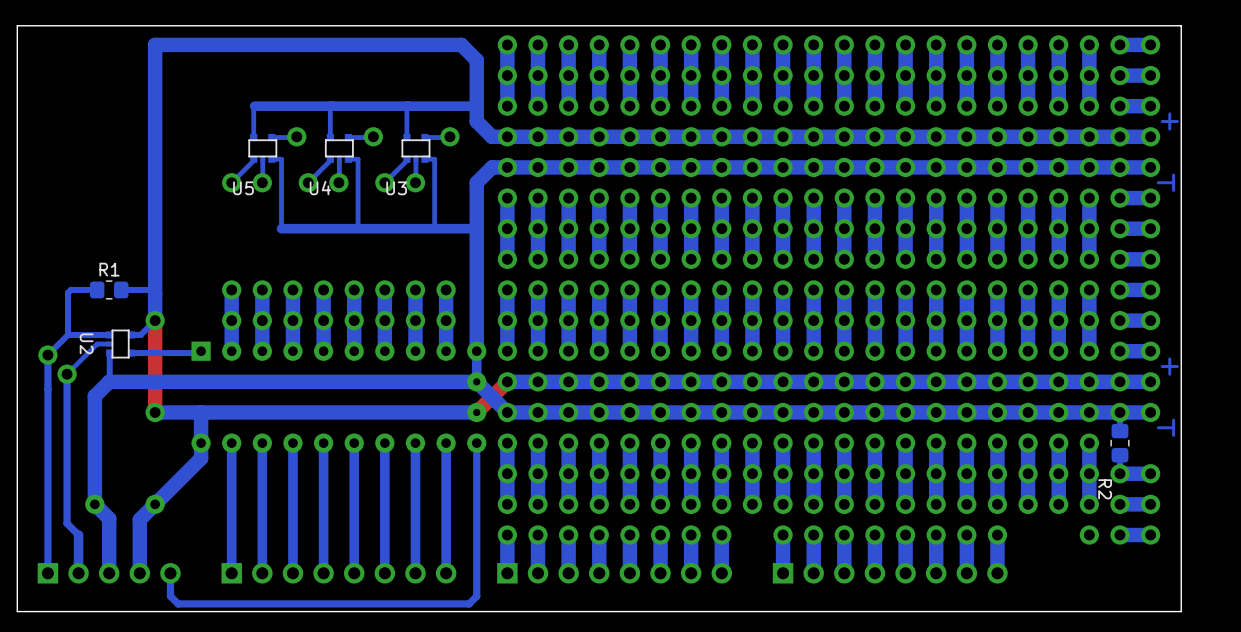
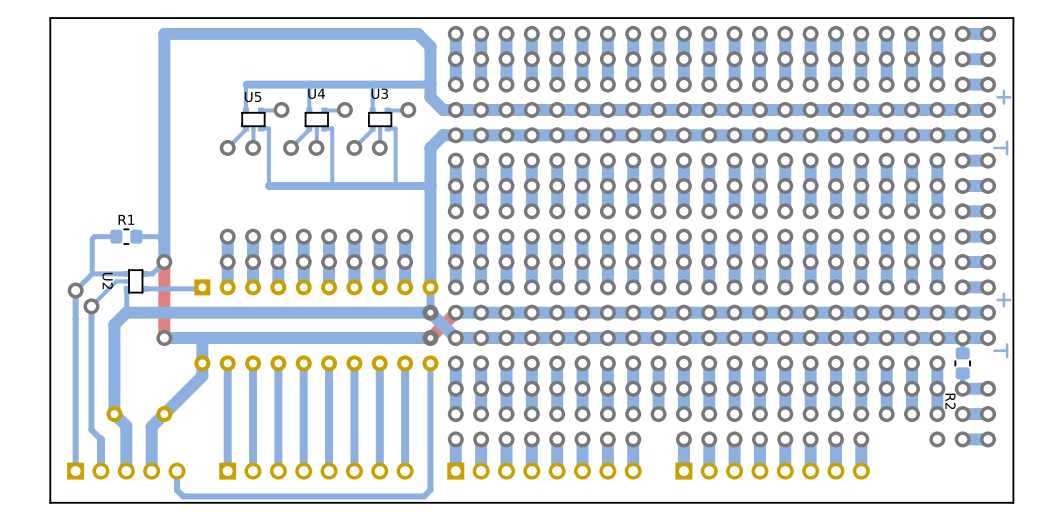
U5 name position: U5 (243, 188) -> U5 (253, 96)
U4 name position: U4 (320, 188) -> U4 (316, 93)
U3 name position: U3 (396, 188) -> U3 (379, 93)

